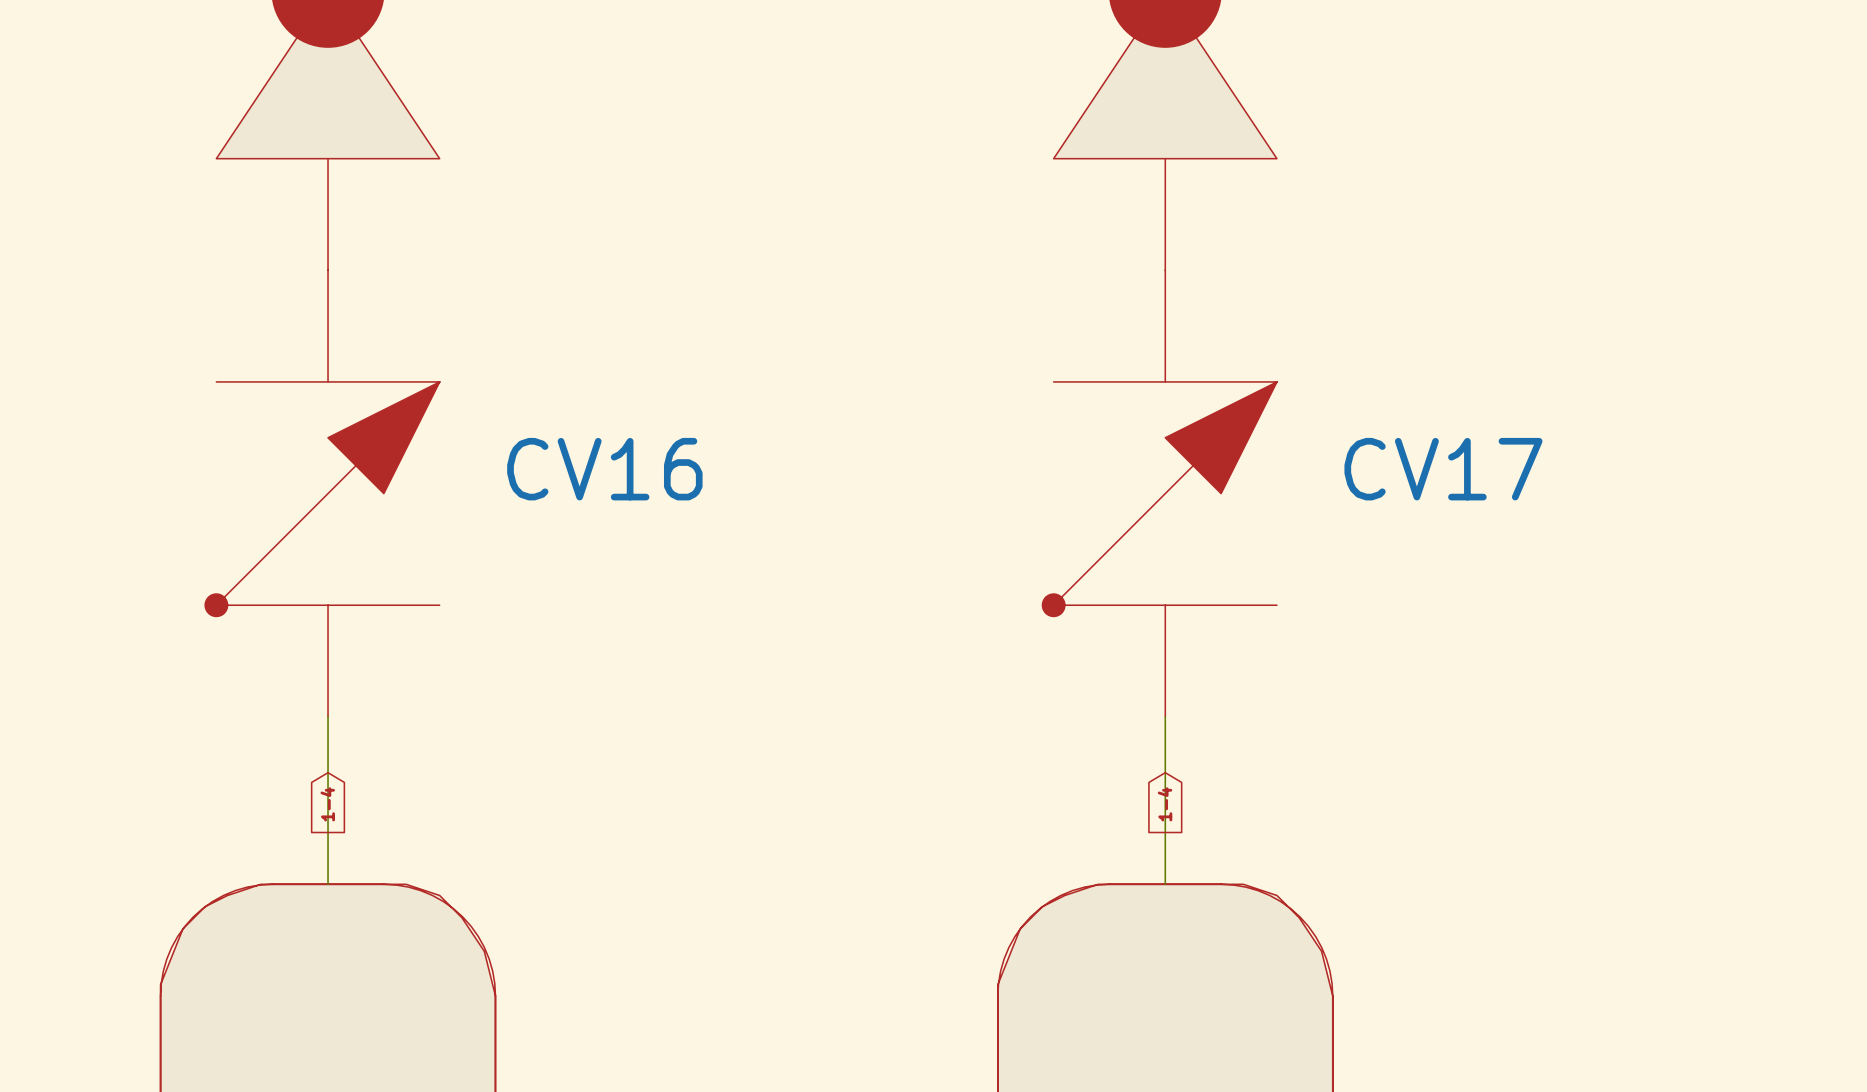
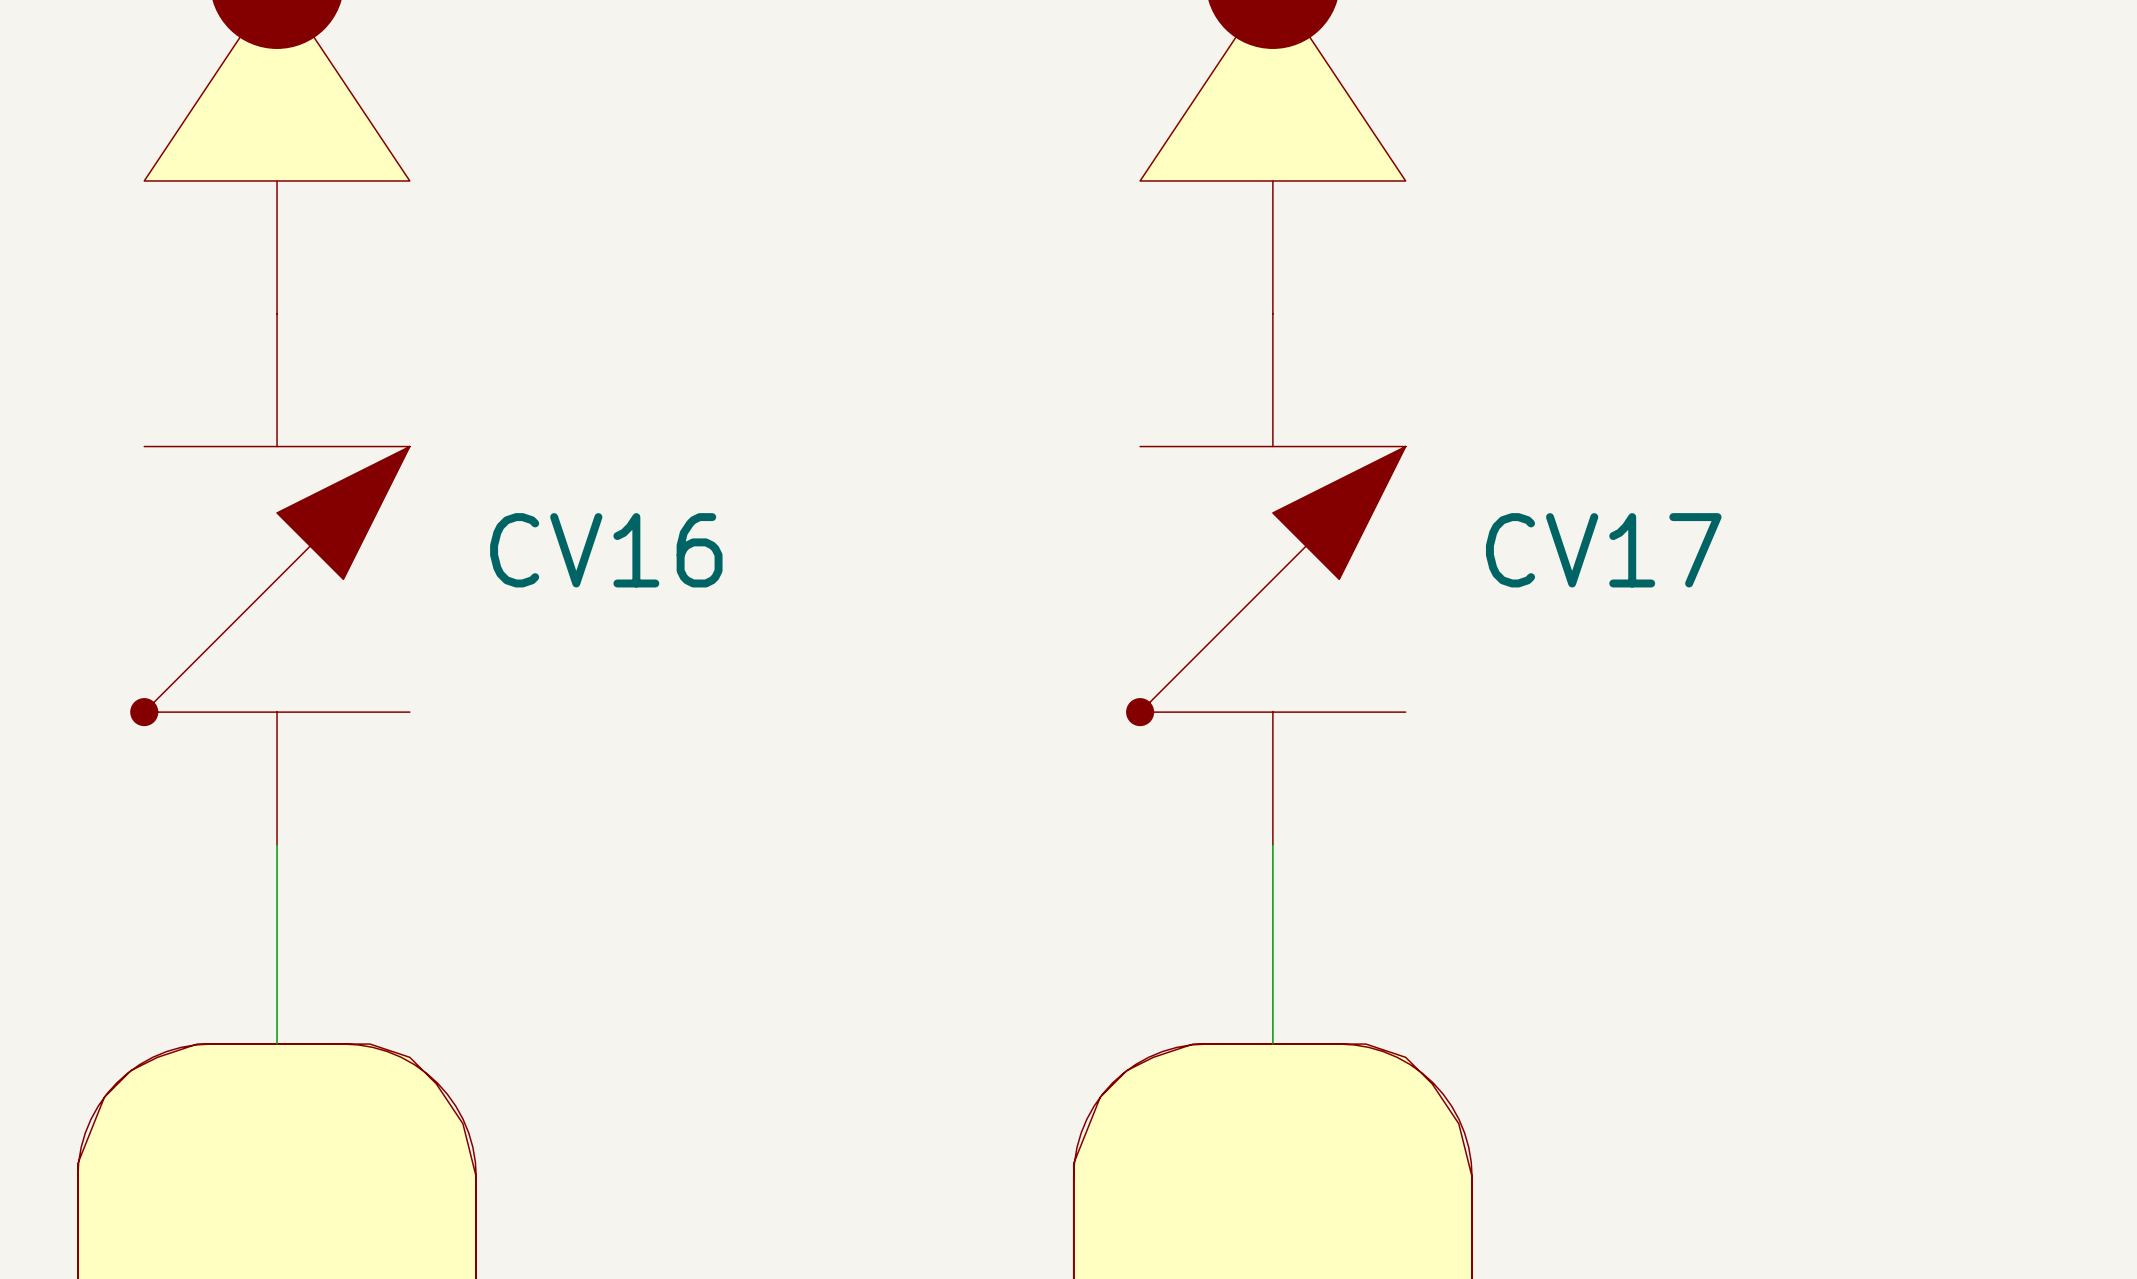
global label: 1-4 (327, 804) -> none
global label: 1-4 (1165, 804) -> none

